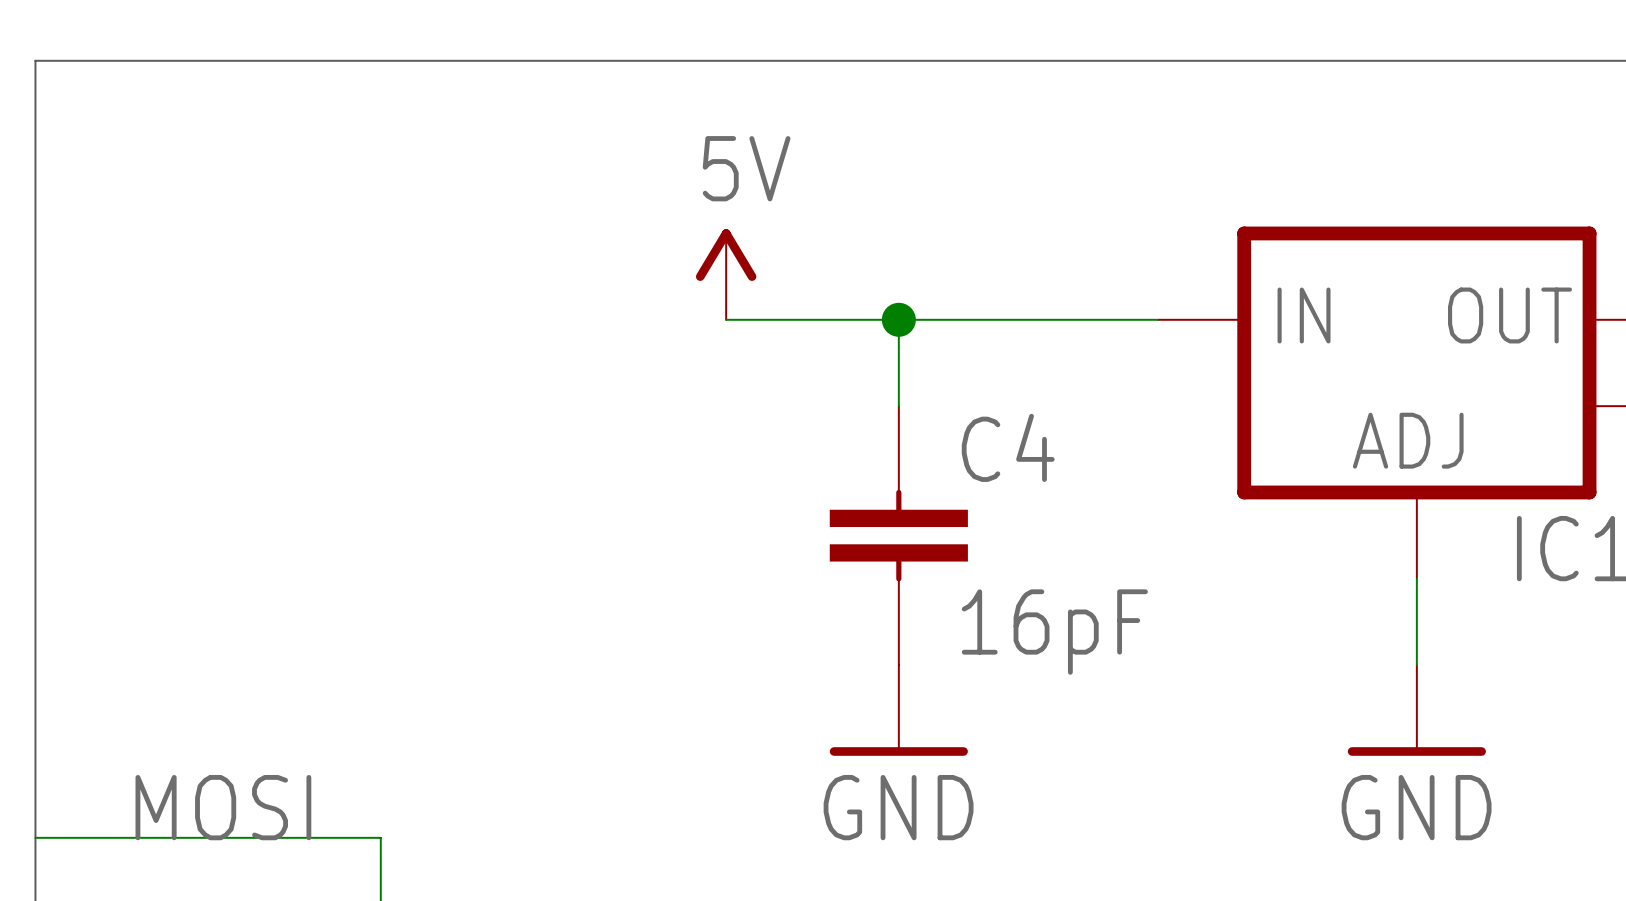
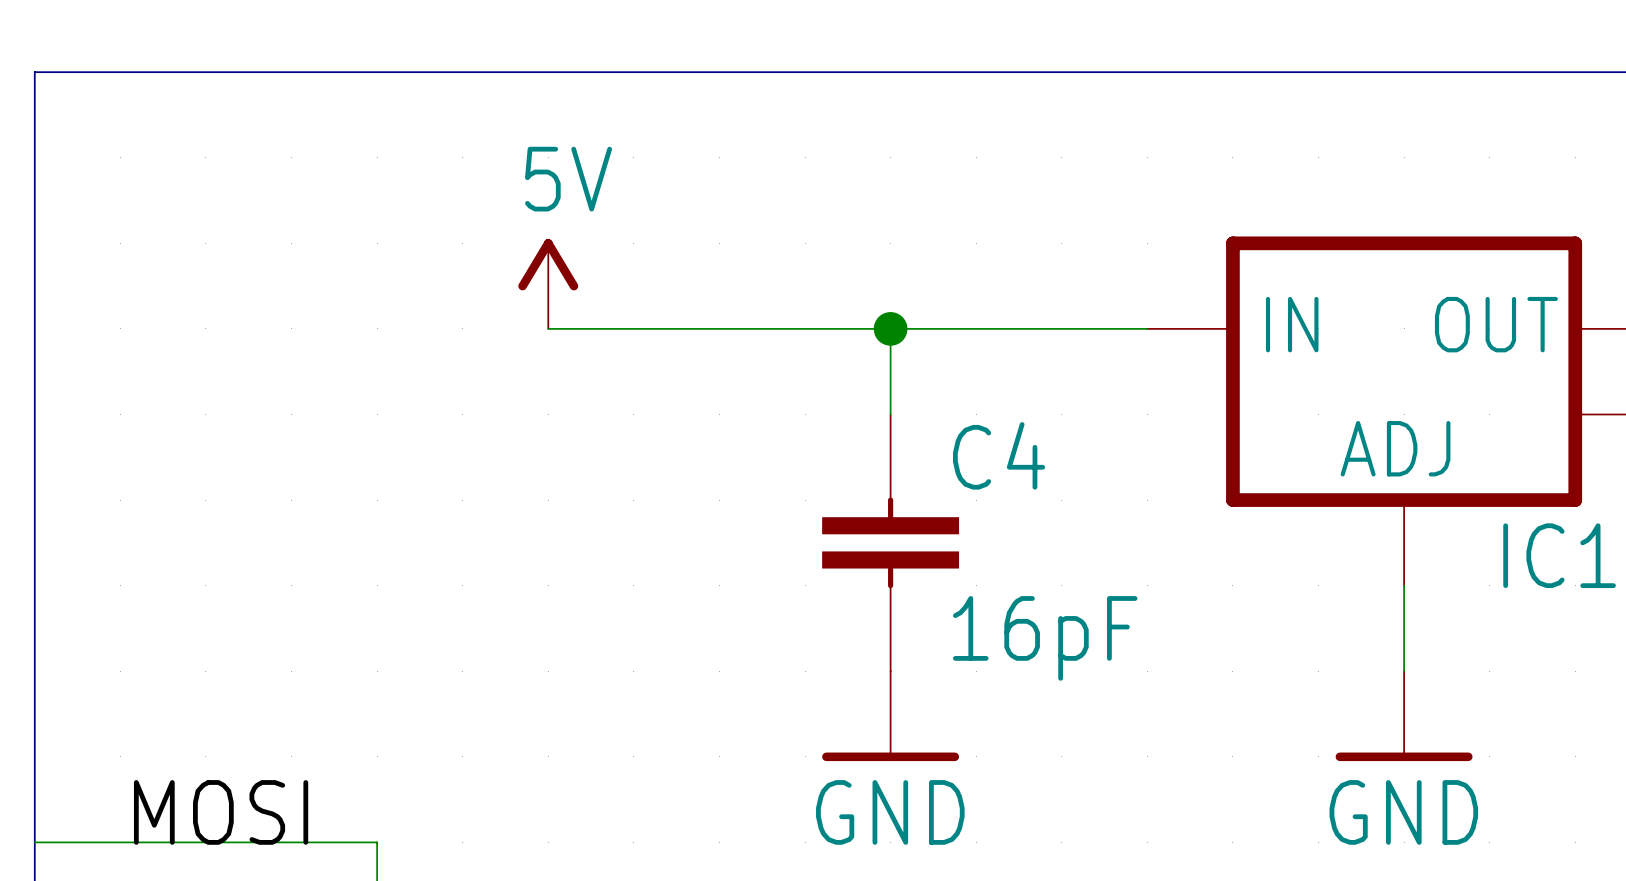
power symbol position: 5V (726, 274) -> 5V (548, 283)
wire: none -> (548, 328) (719, 328)

